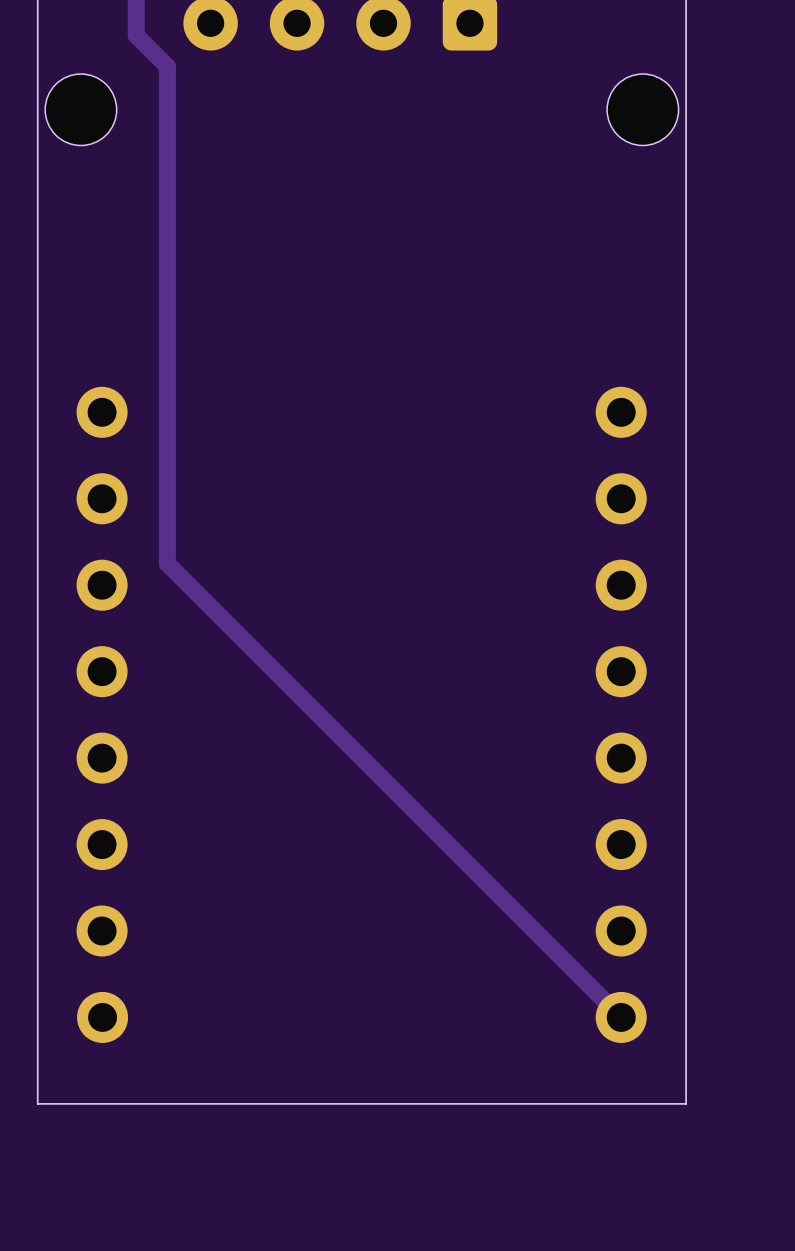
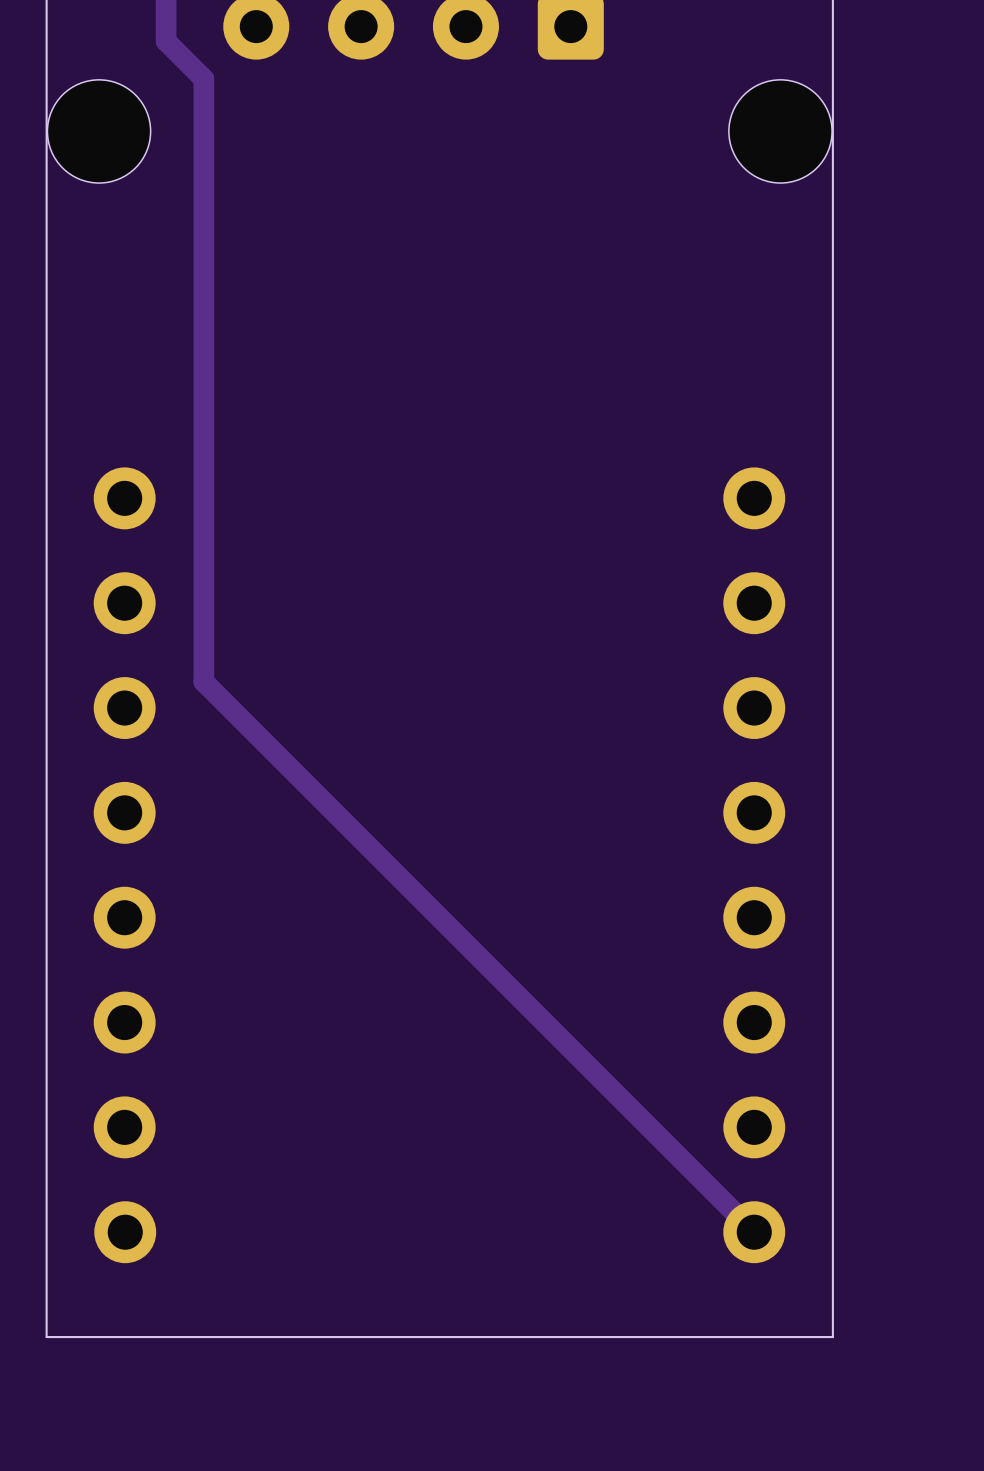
part footprint: [45, 74, 117, 146] -> [47, 79, 151, 184]
part footprint: [607, 74, 679, 146] -> [728, 79, 833, 184]

